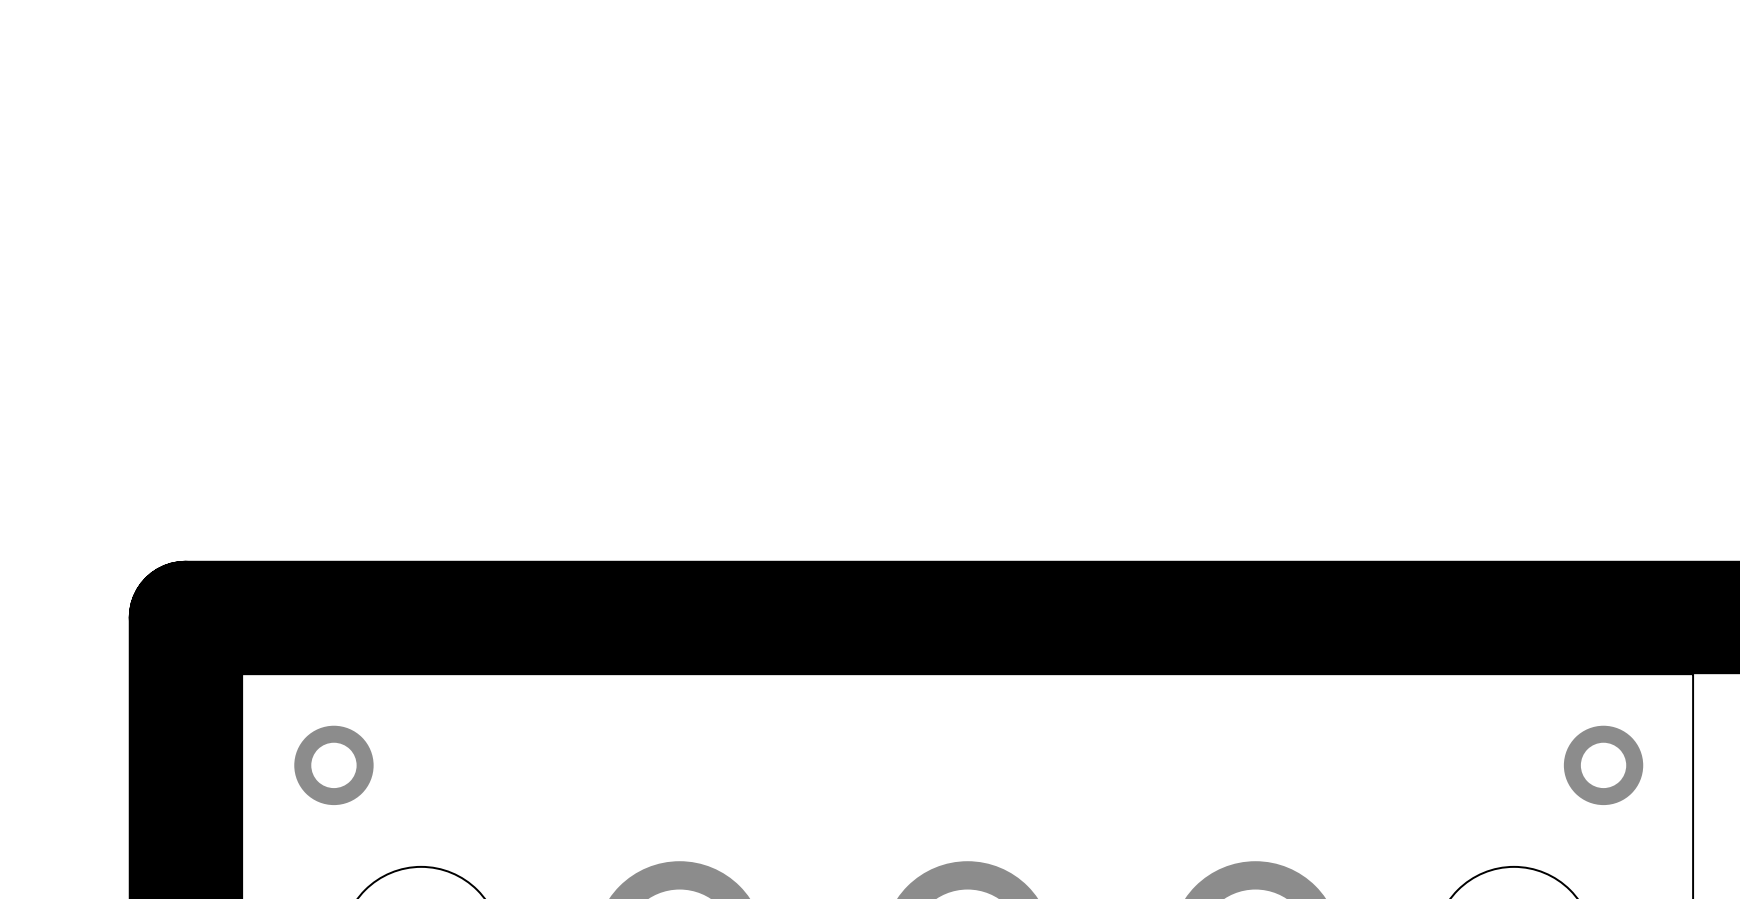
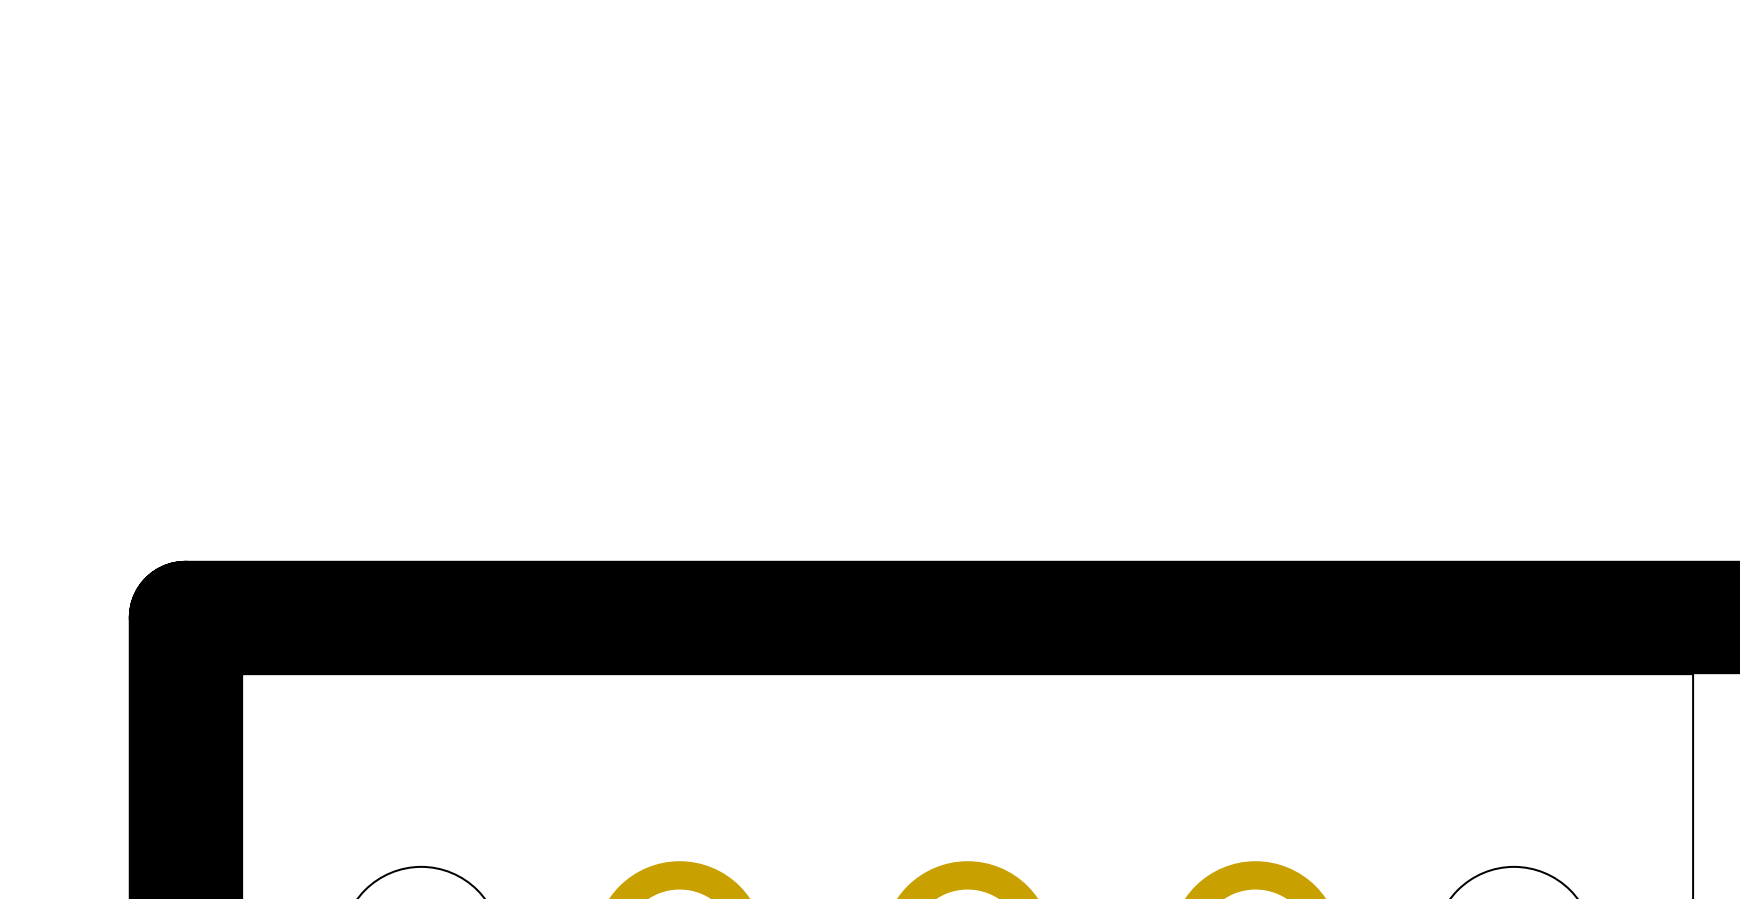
via: (333, 765) -> none
via: (1603, 765) -> none

